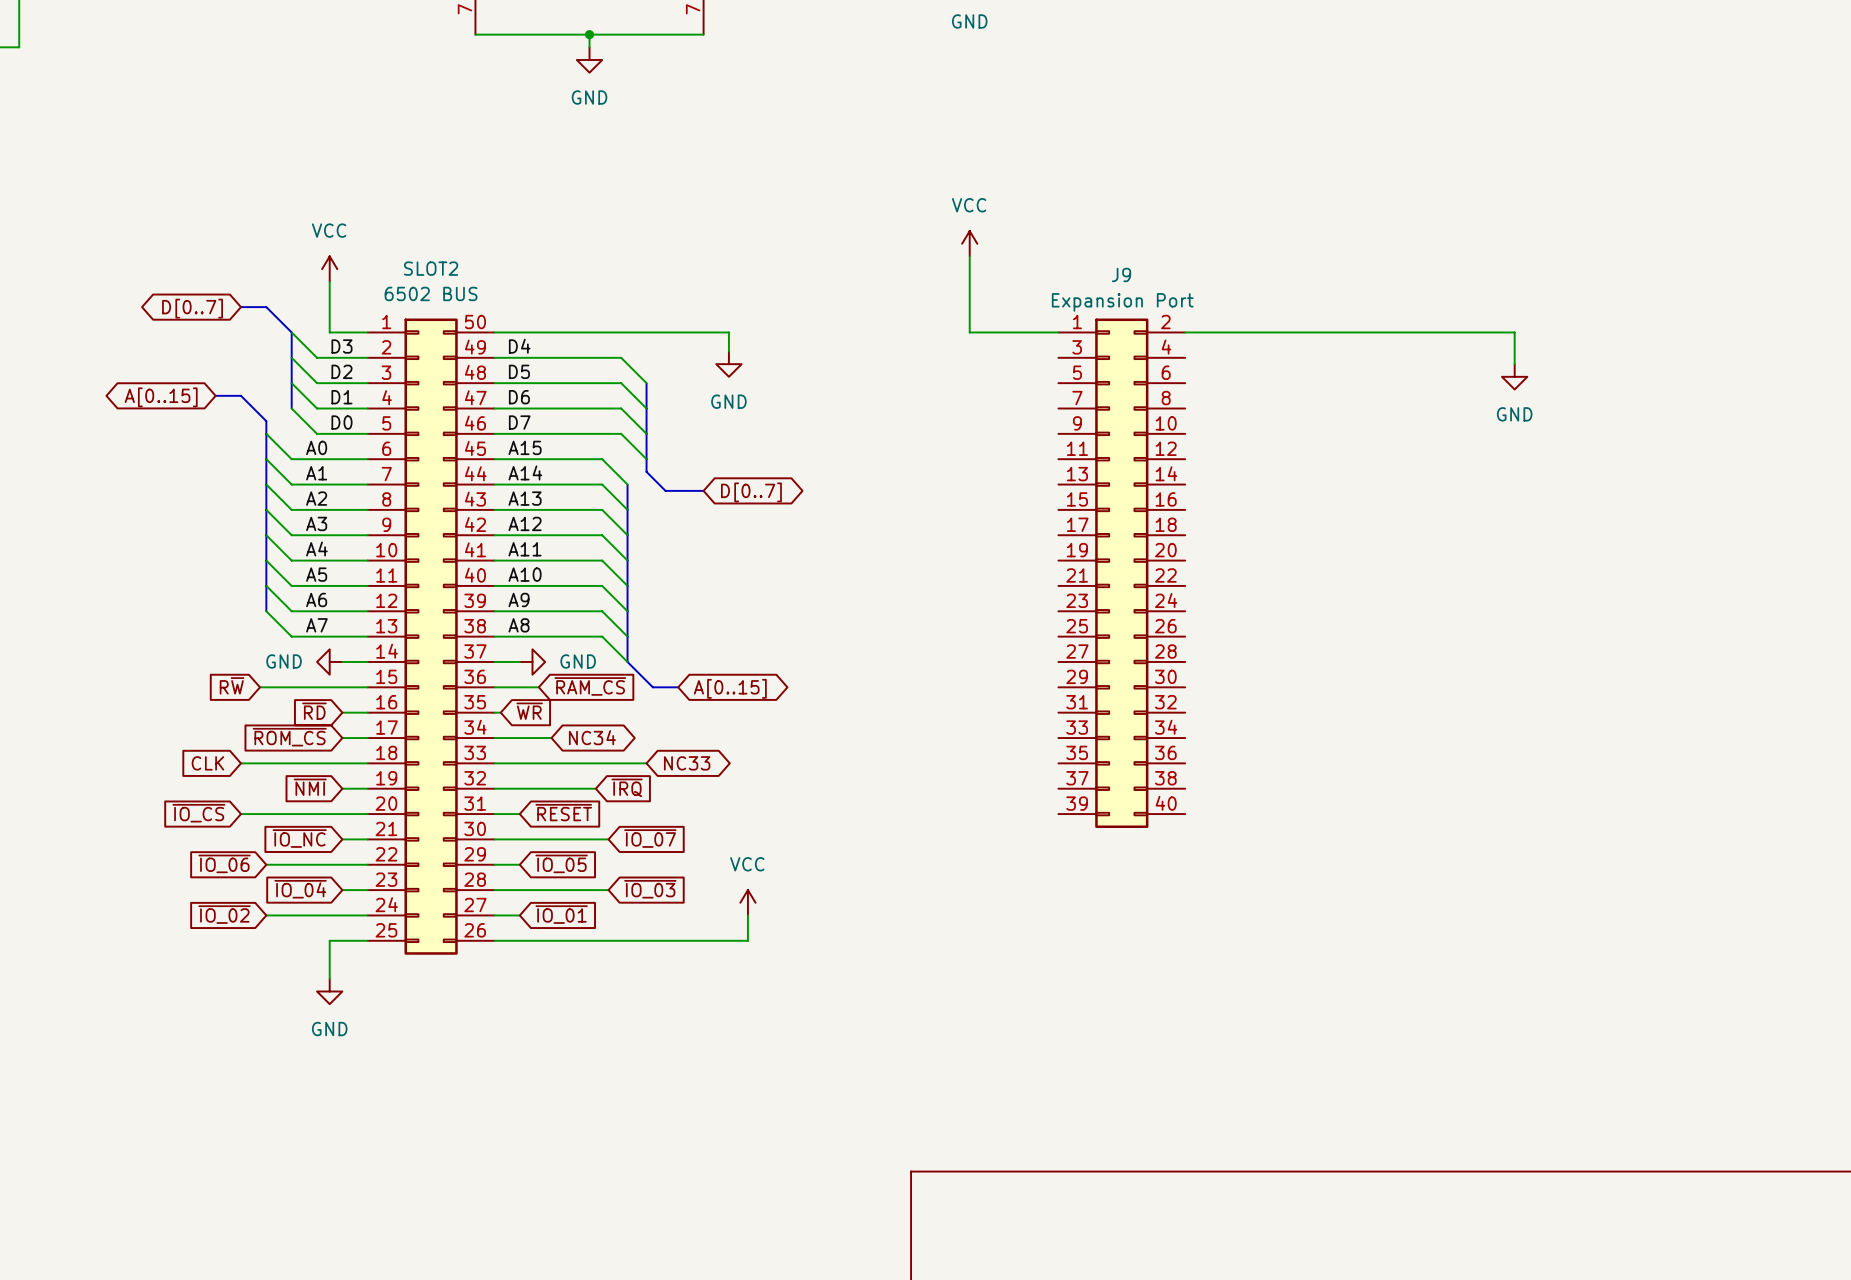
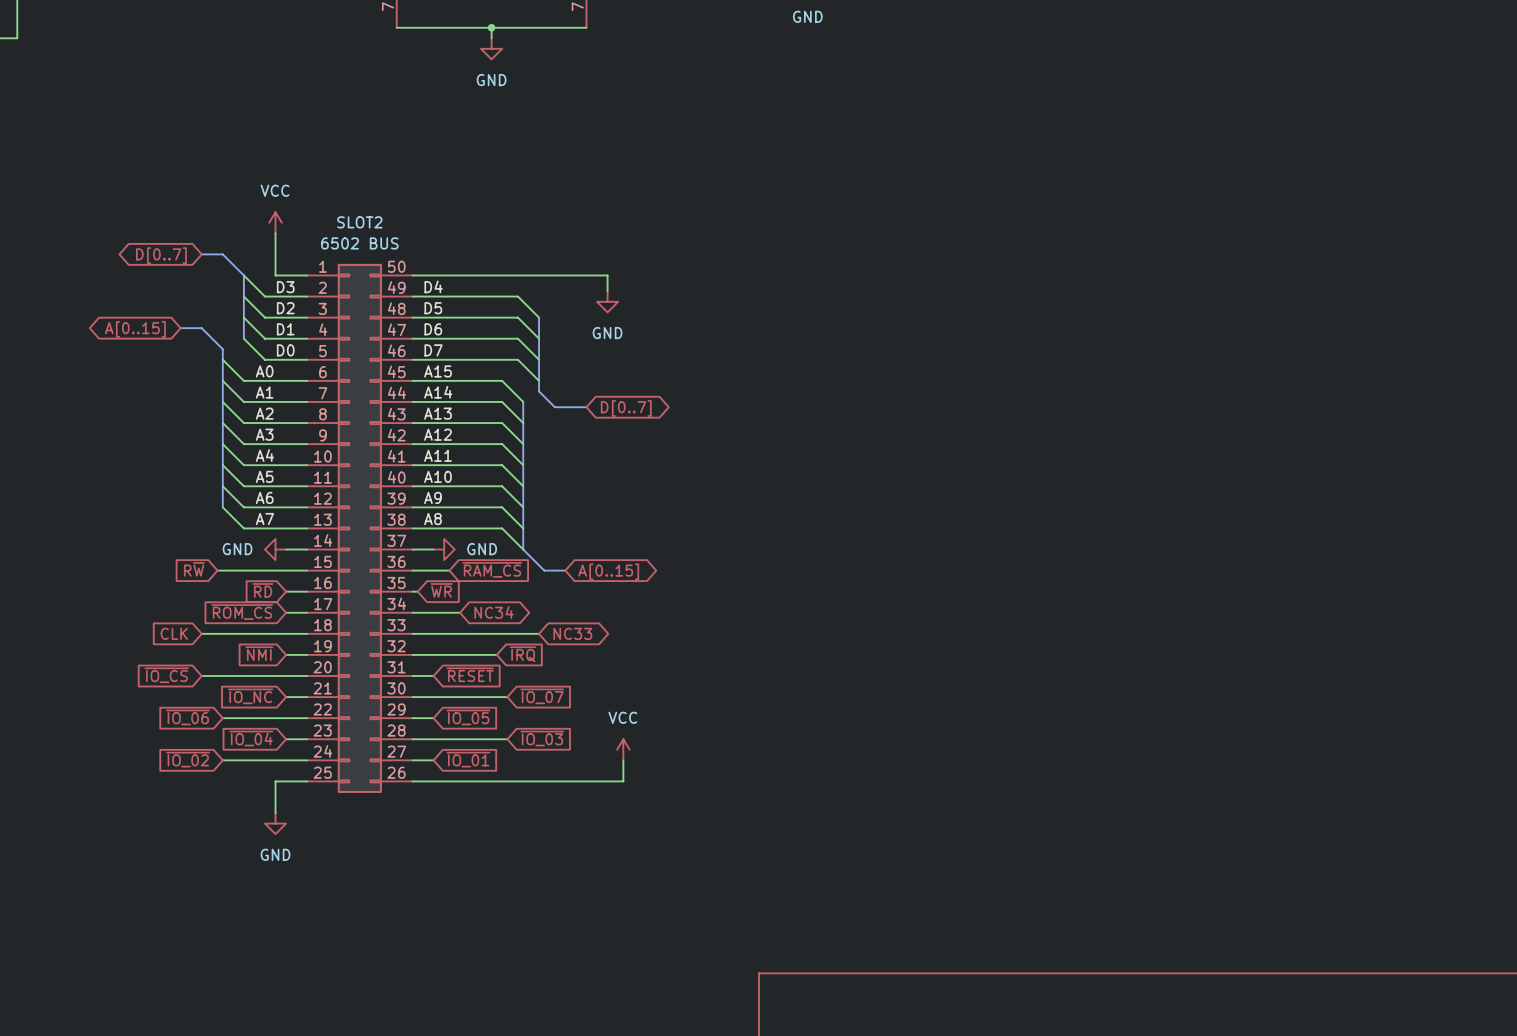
power symbol: VCC (969, 243) -> none
wire: (969, 256) (969, 332) (1058, 332) -> none
wire: (1185, 332) (1514, 332) (1514, 364) -> none
power symbol: GND (1514, 376) -> none
J9: Expansion Port (1121, 573) -> none

